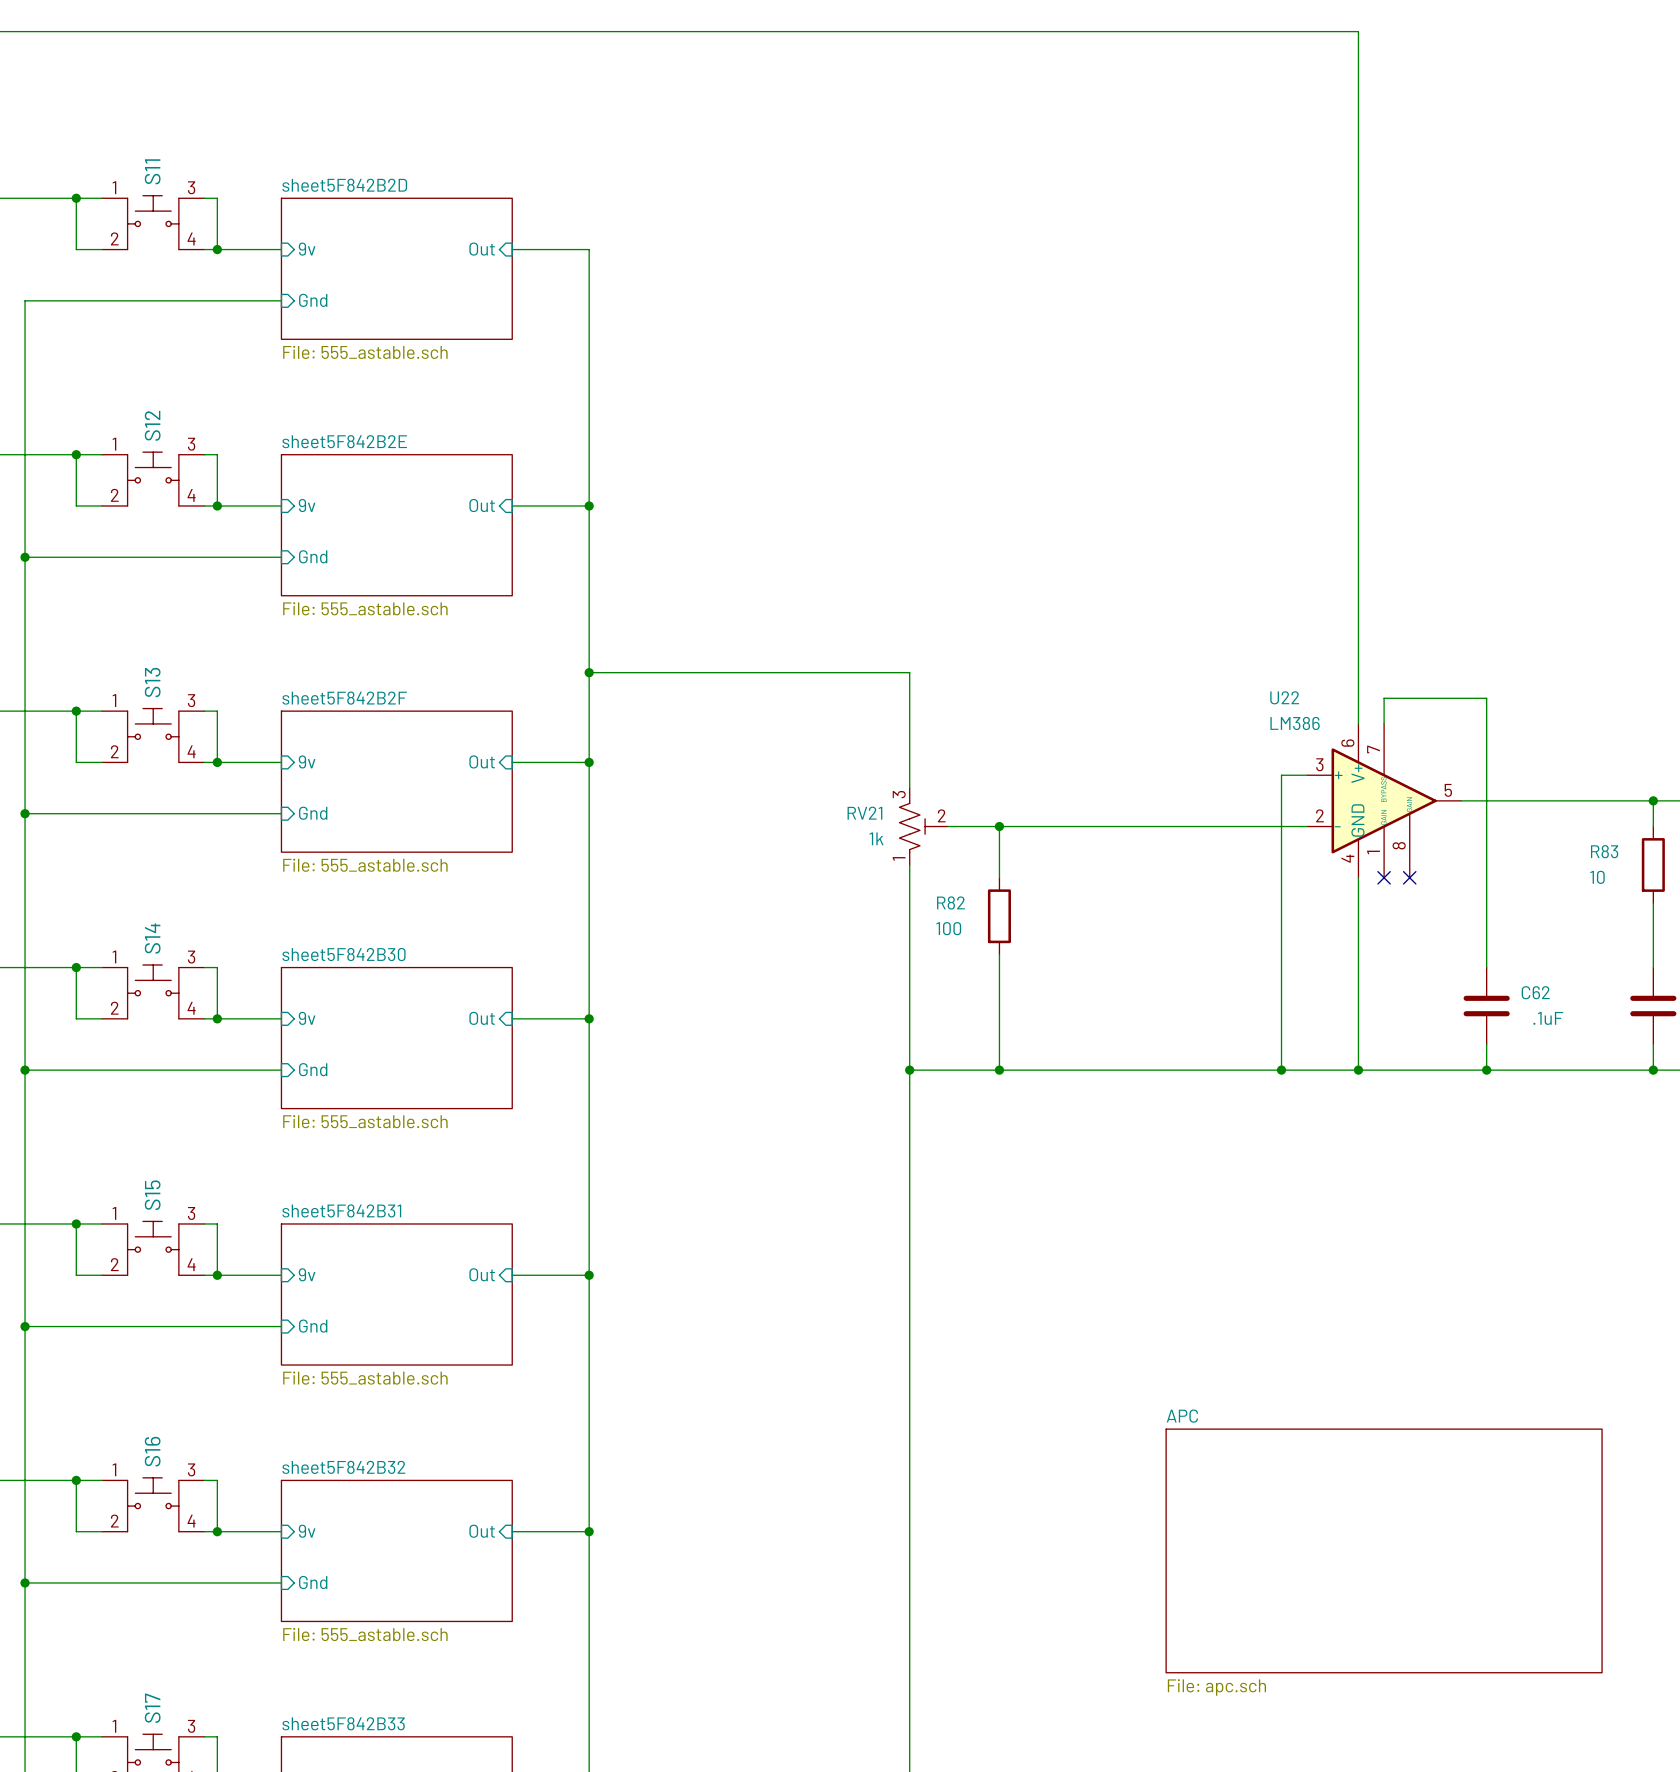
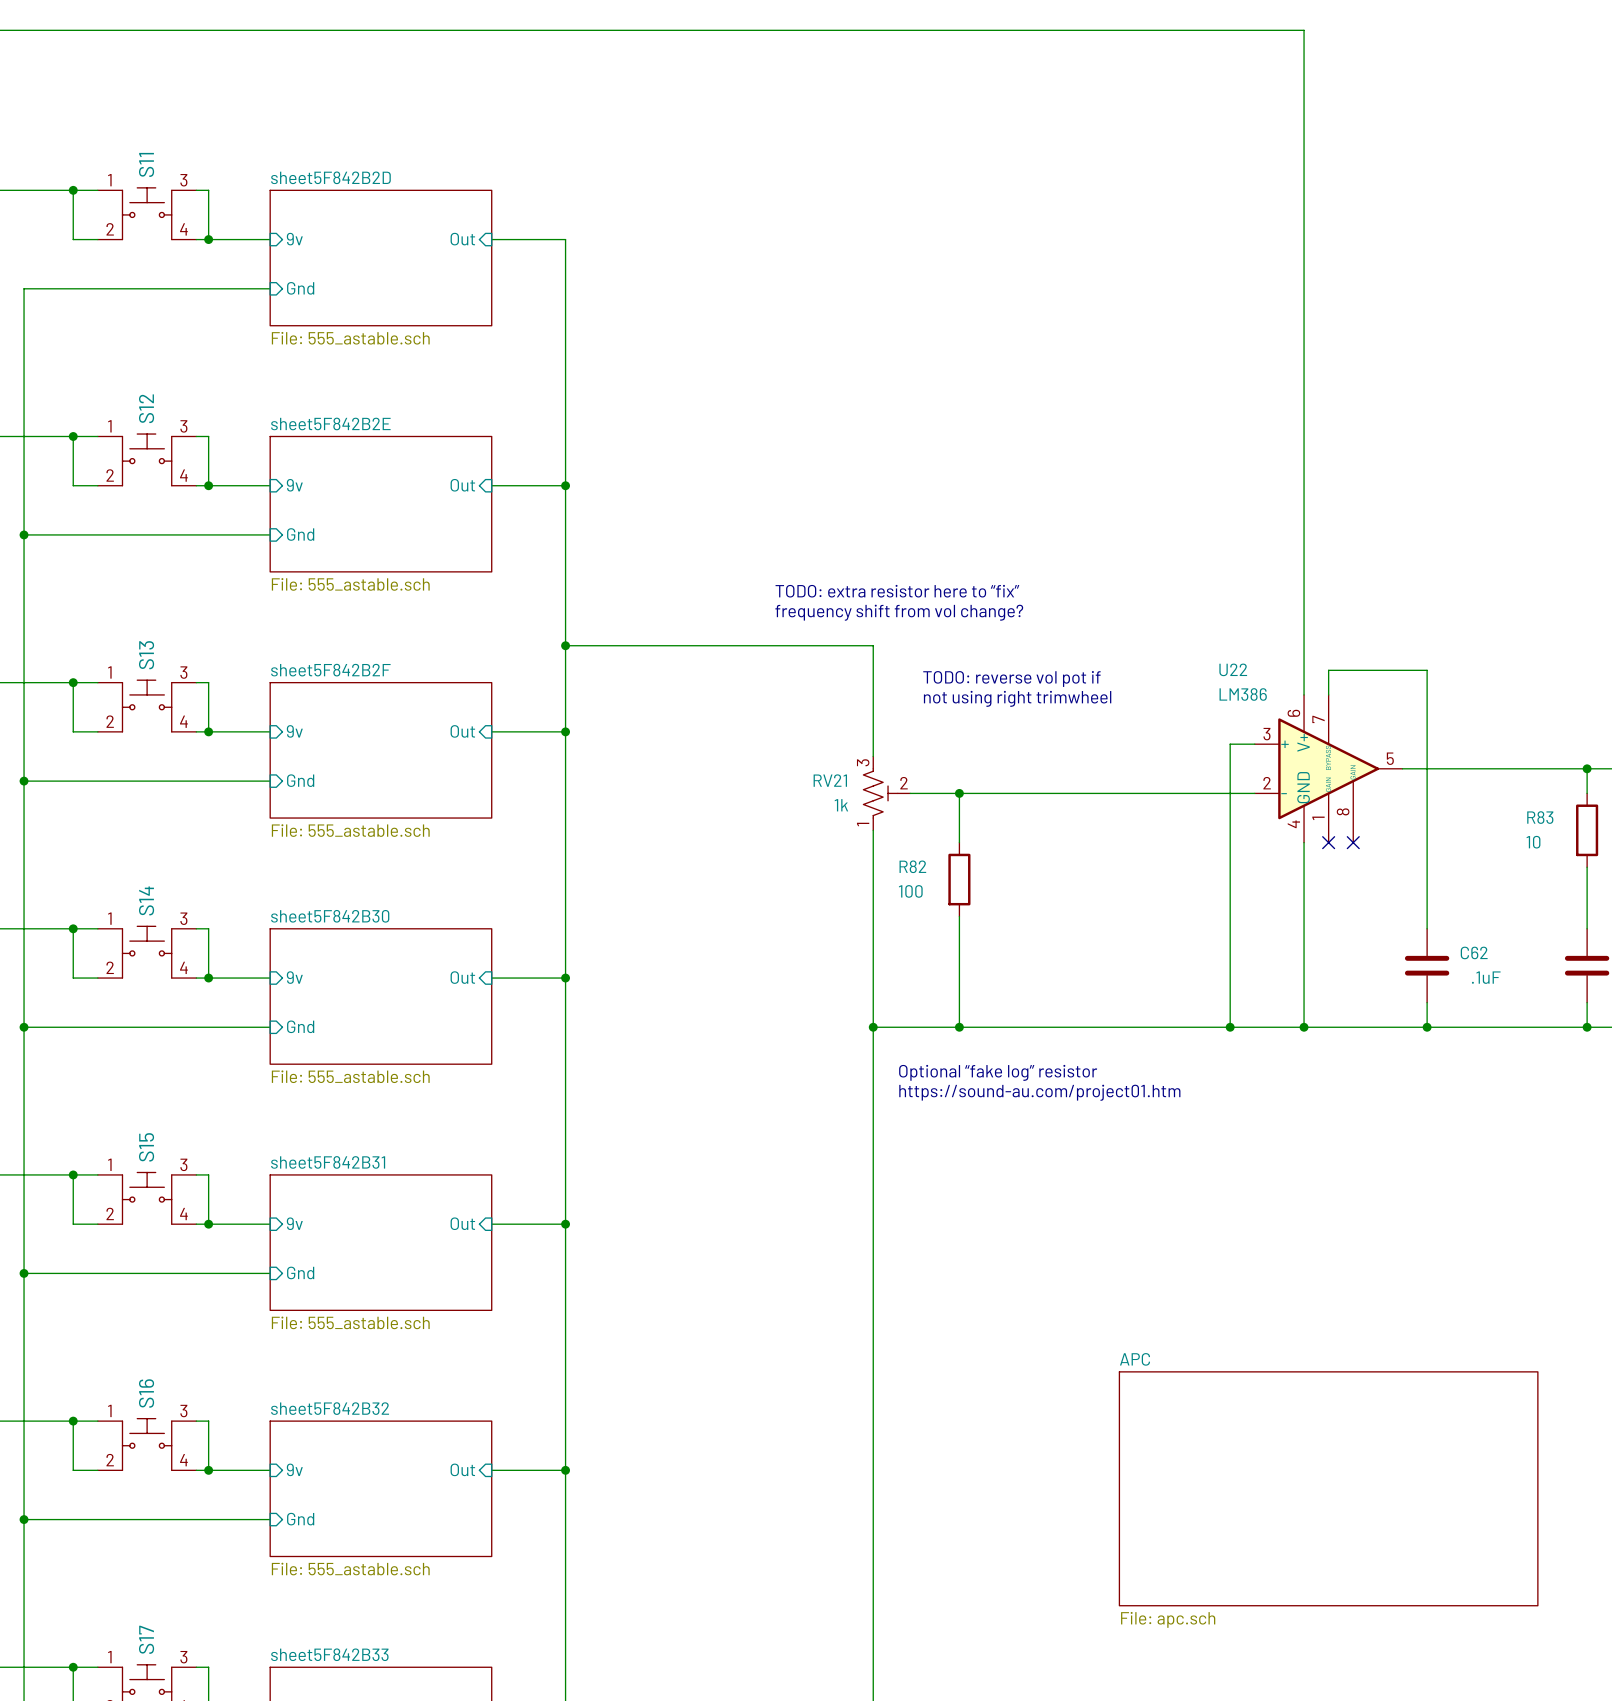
text: none -> TODO: extra resistor here to “fix” (897, 591)
text: none -> frequency shift from vol change? (899, 612)
text: none -> TODO: reverse vol pot if (1011, 678)
text: none -> not using right trimwheel (1017, 698)
text: none -> Optional “fake log” resistor (998, 1072)
text: none -> https://sound-au.com/project01.htm (1039, 1092)

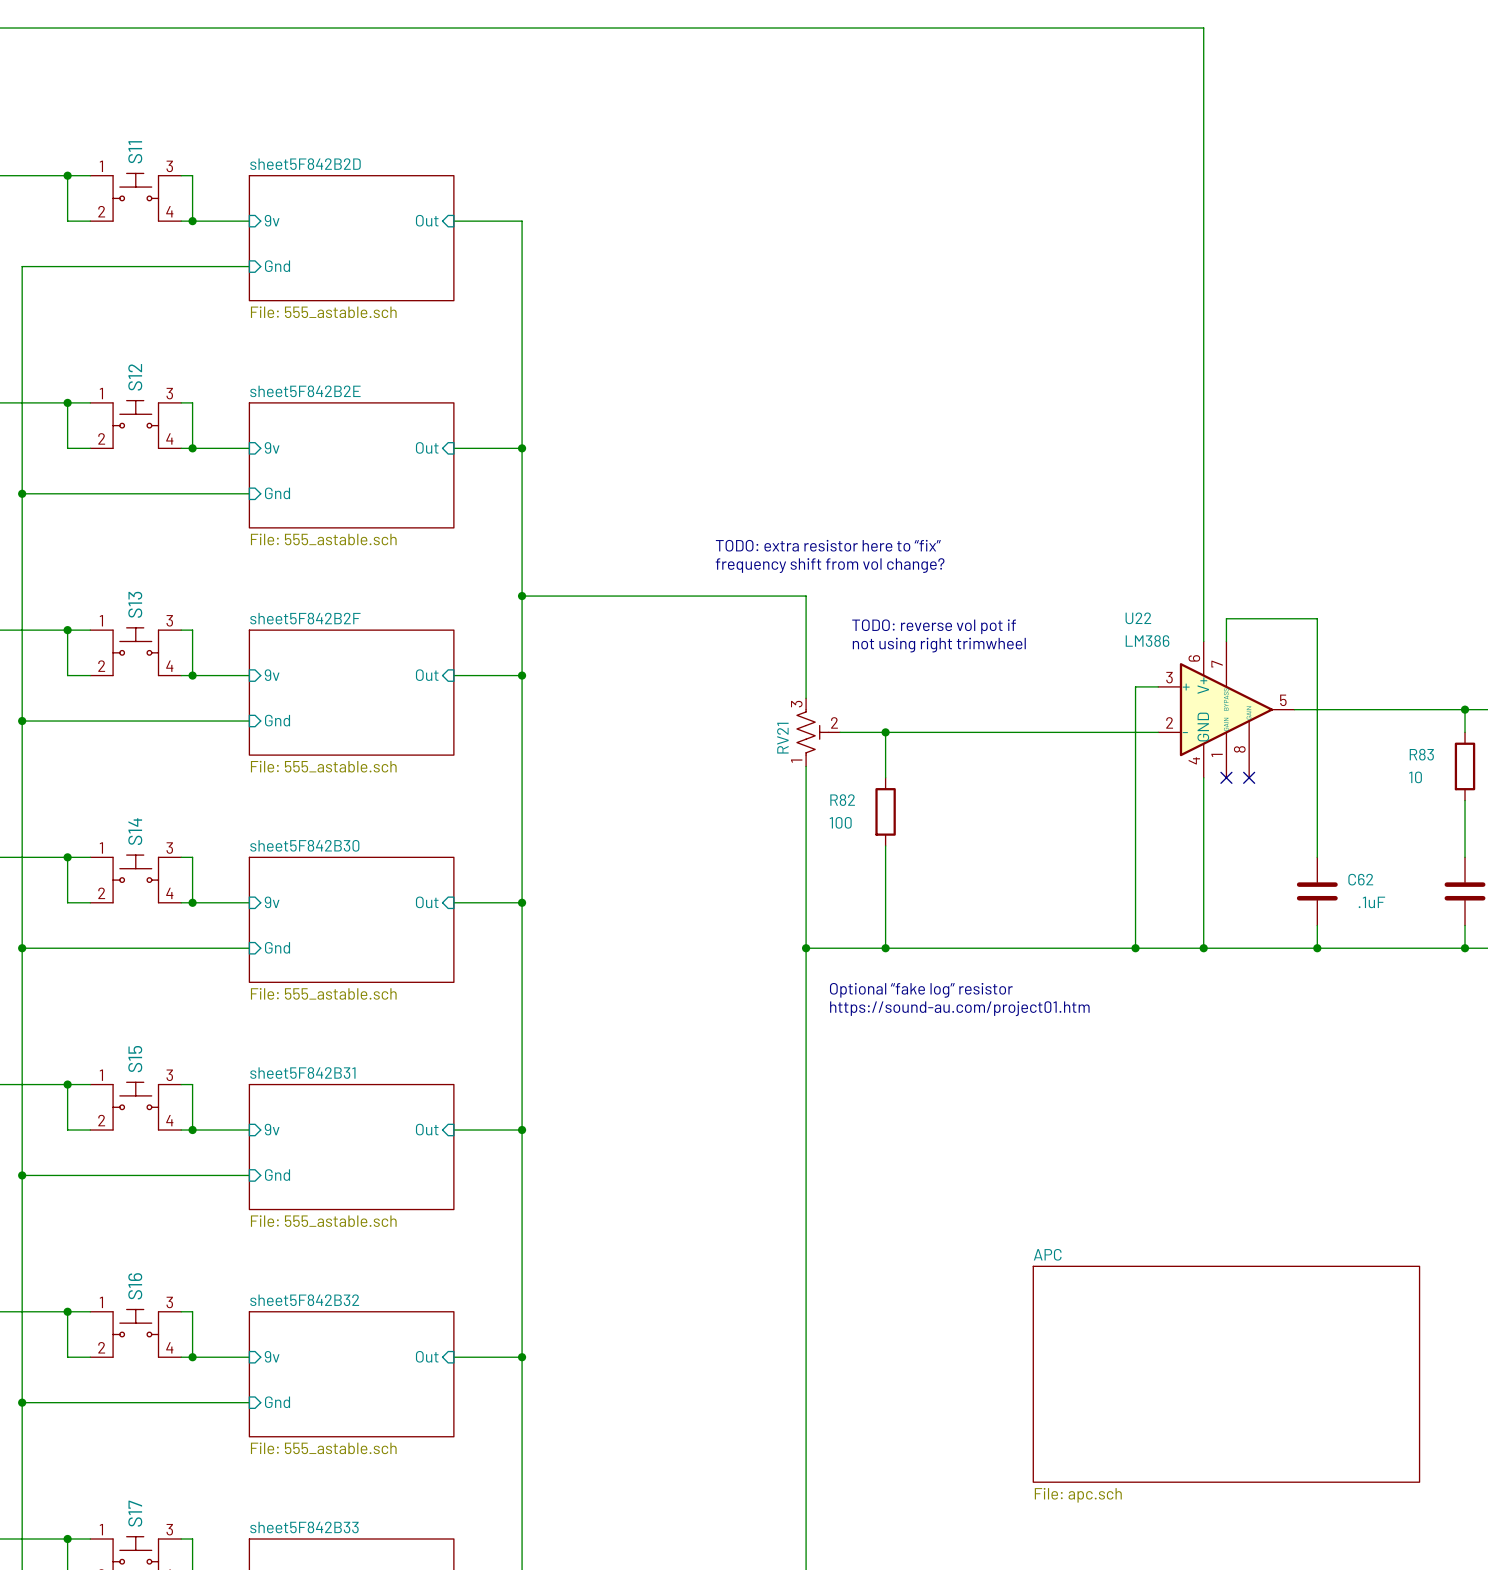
RV21 name rotation: 0° (830, 780) -> 90° counterclockwise (782, 738)
RV21 value: 1k (841, 805) -> none

